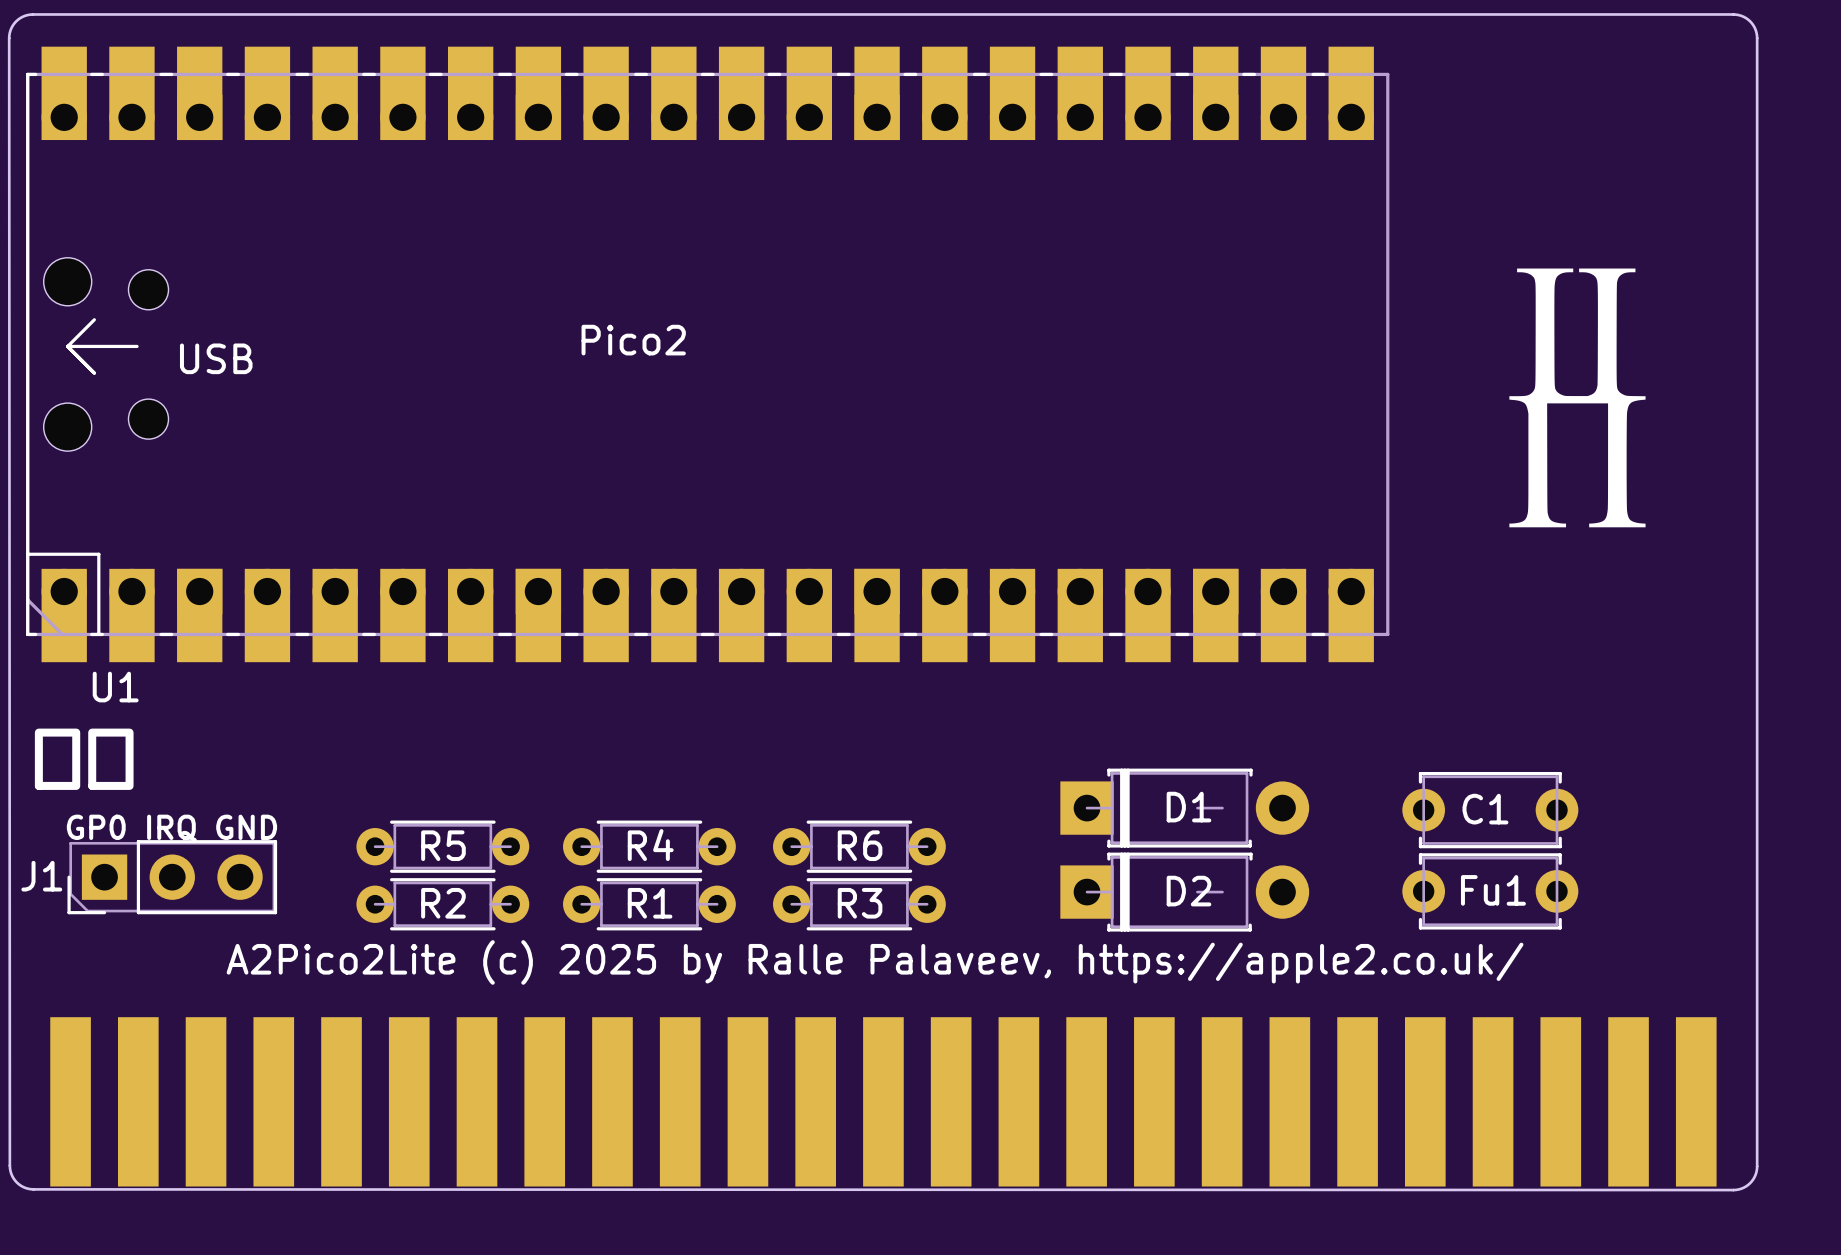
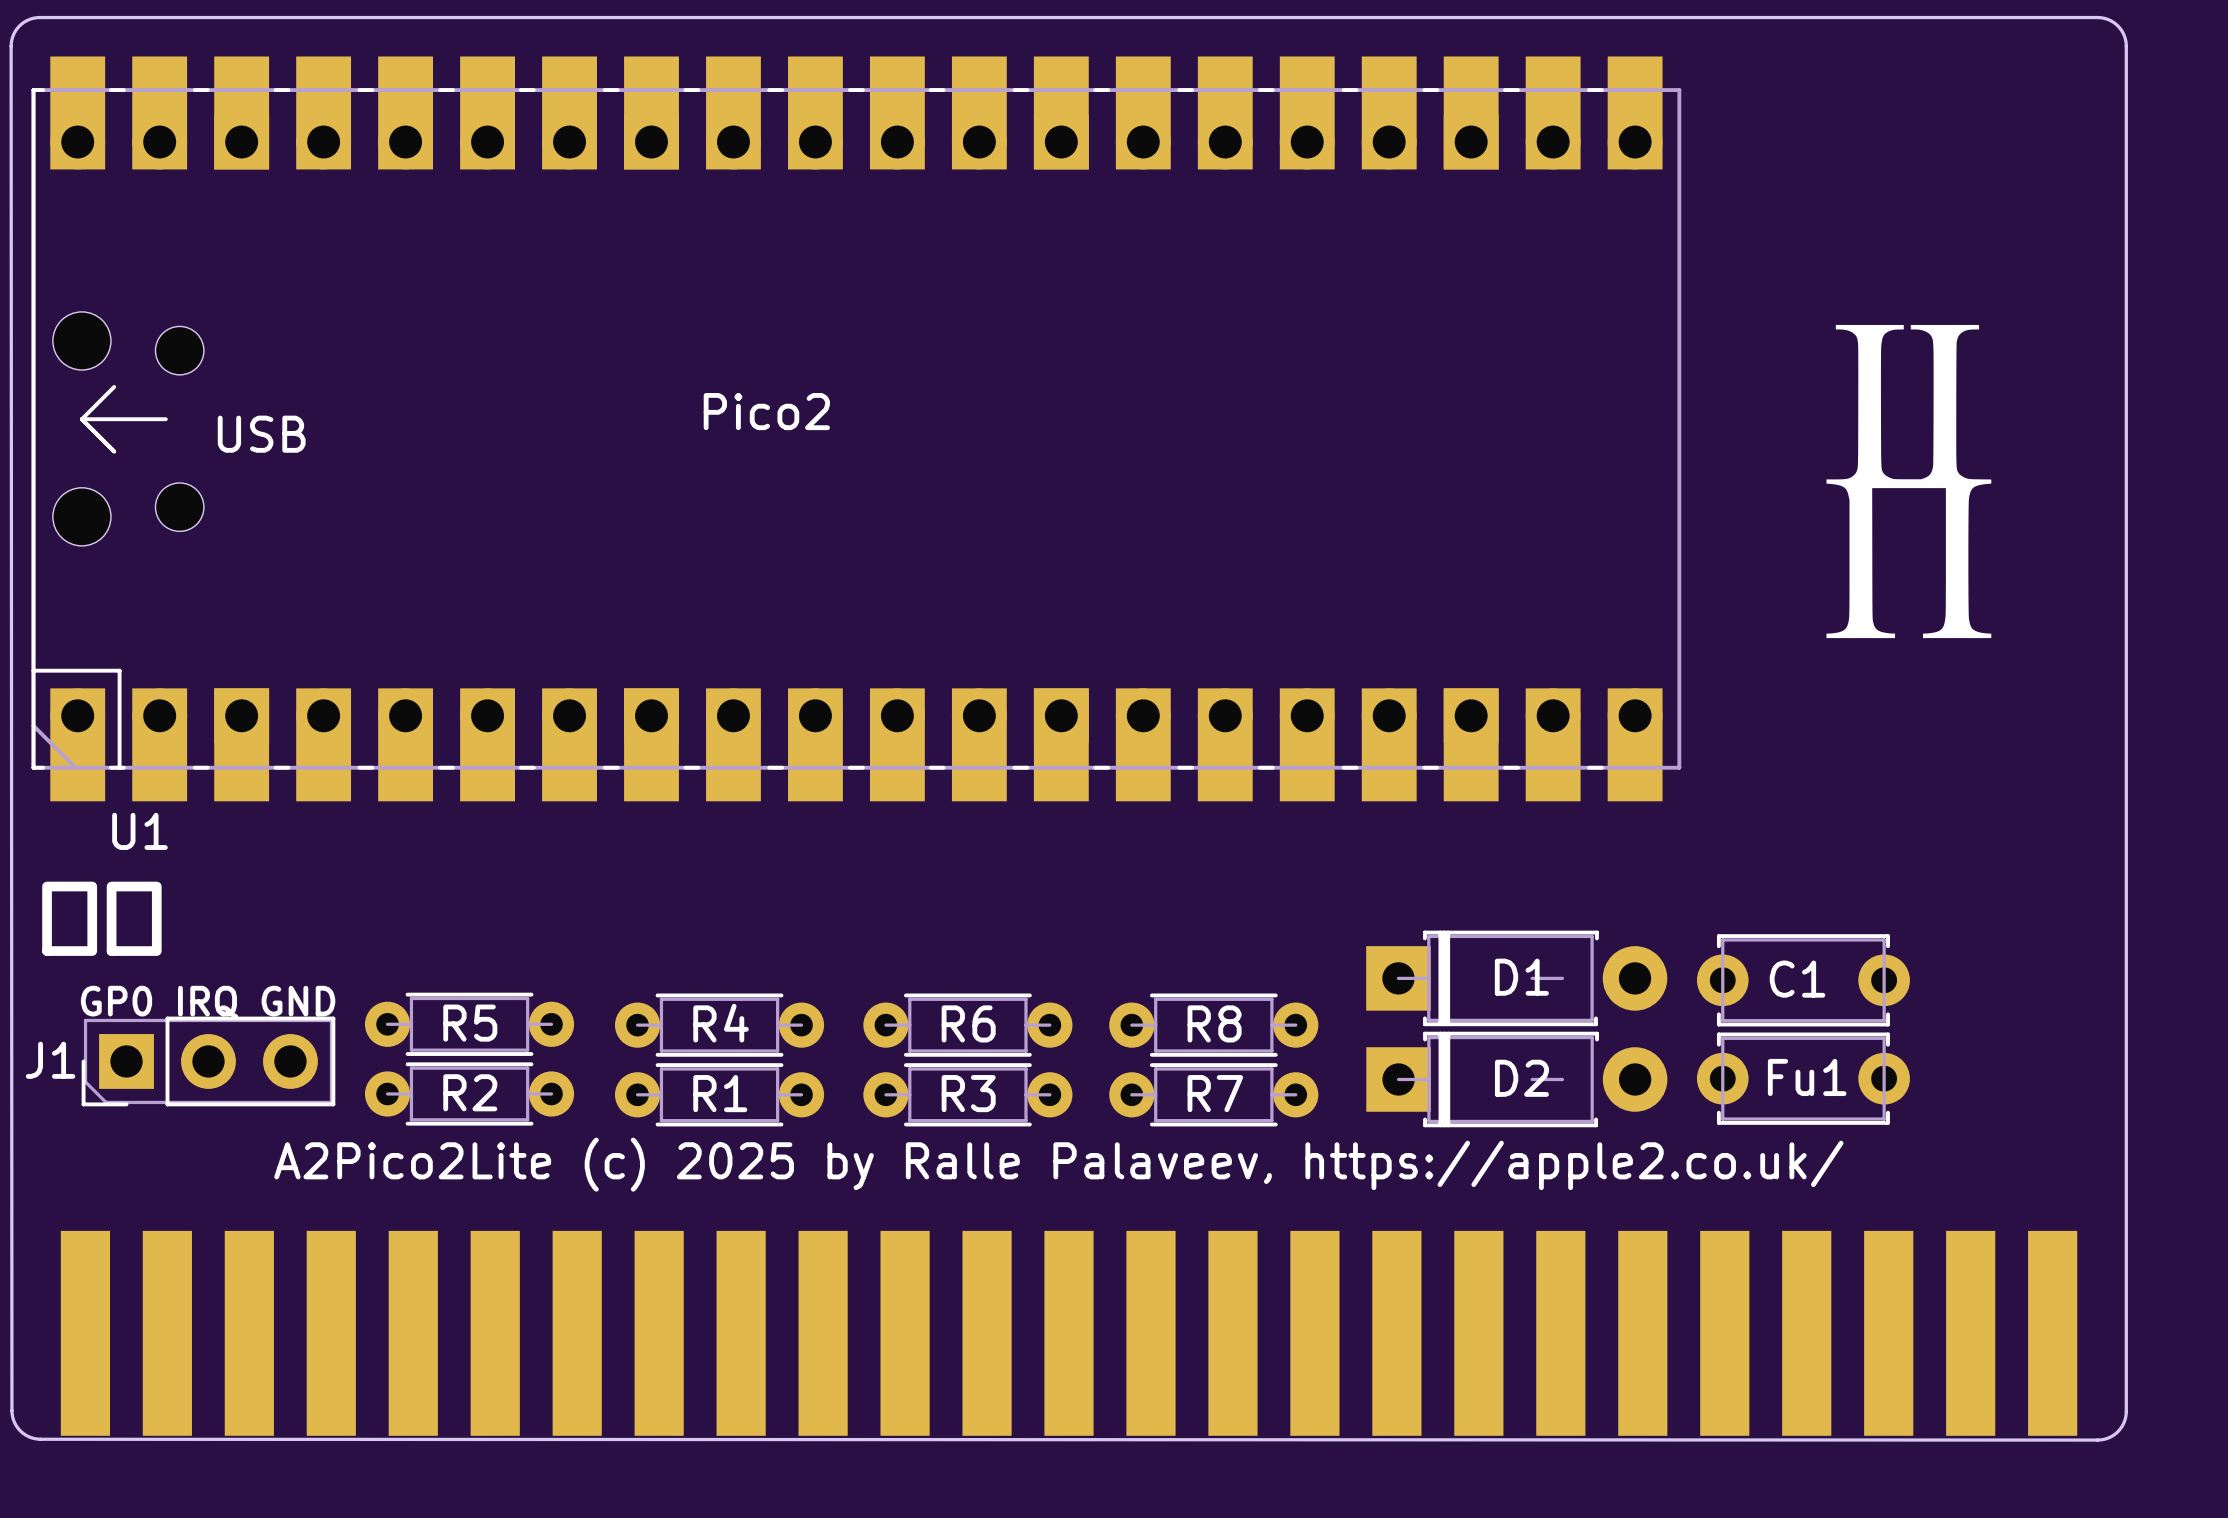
D1 position: (1184, 808) -> (1516, 978)
R5 position: (442, 846) -> (469, 1024)
R4 position: (649, 846) -> (719, 1025)
R6 position: (859, 846) -> (967, 1025)
R8: none -> (1213, 1025)
D2 position: (1184, 892) -> (1516, 1079)
R2 position: (442, 904) -> (469, 1093)
R1 position: (649, 904) -> (719, 1094)
R3 position: (859, 904) -> (967, 1094)
R7: none -> (1213, 1094)

